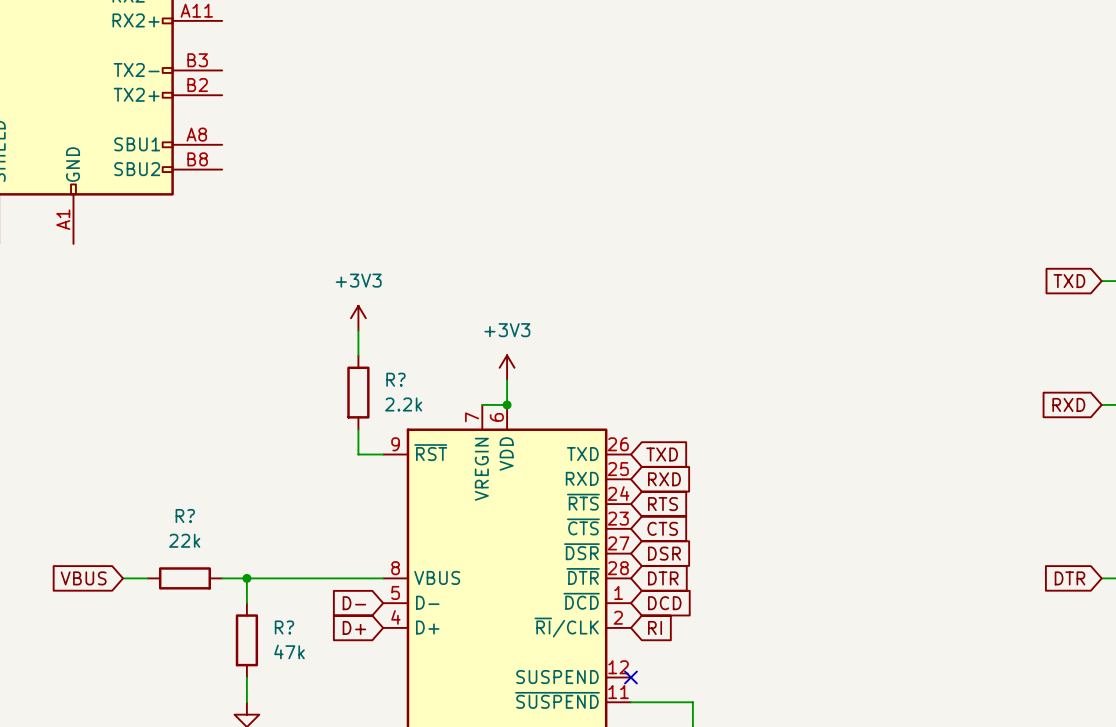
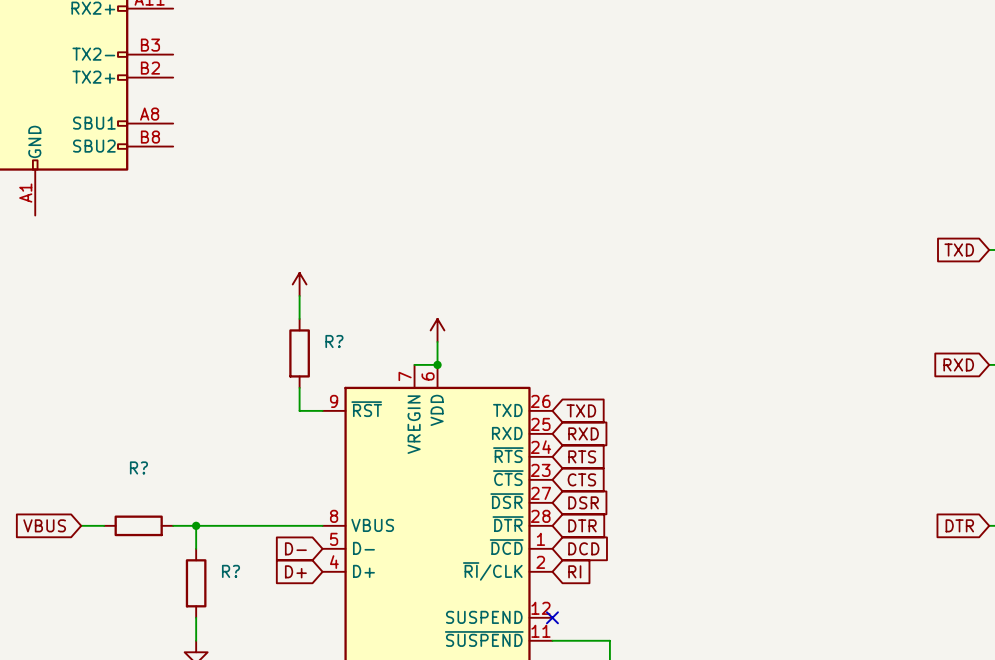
power symbol text: +3V3 (358, 280) -> none
power symbol text: +3V3 (507, 330) -> none
R? value: 2.2k (403, 404) -> none
R? value: 22k (184, 540) -> none
R? value: 47k (289, 651) -> none

